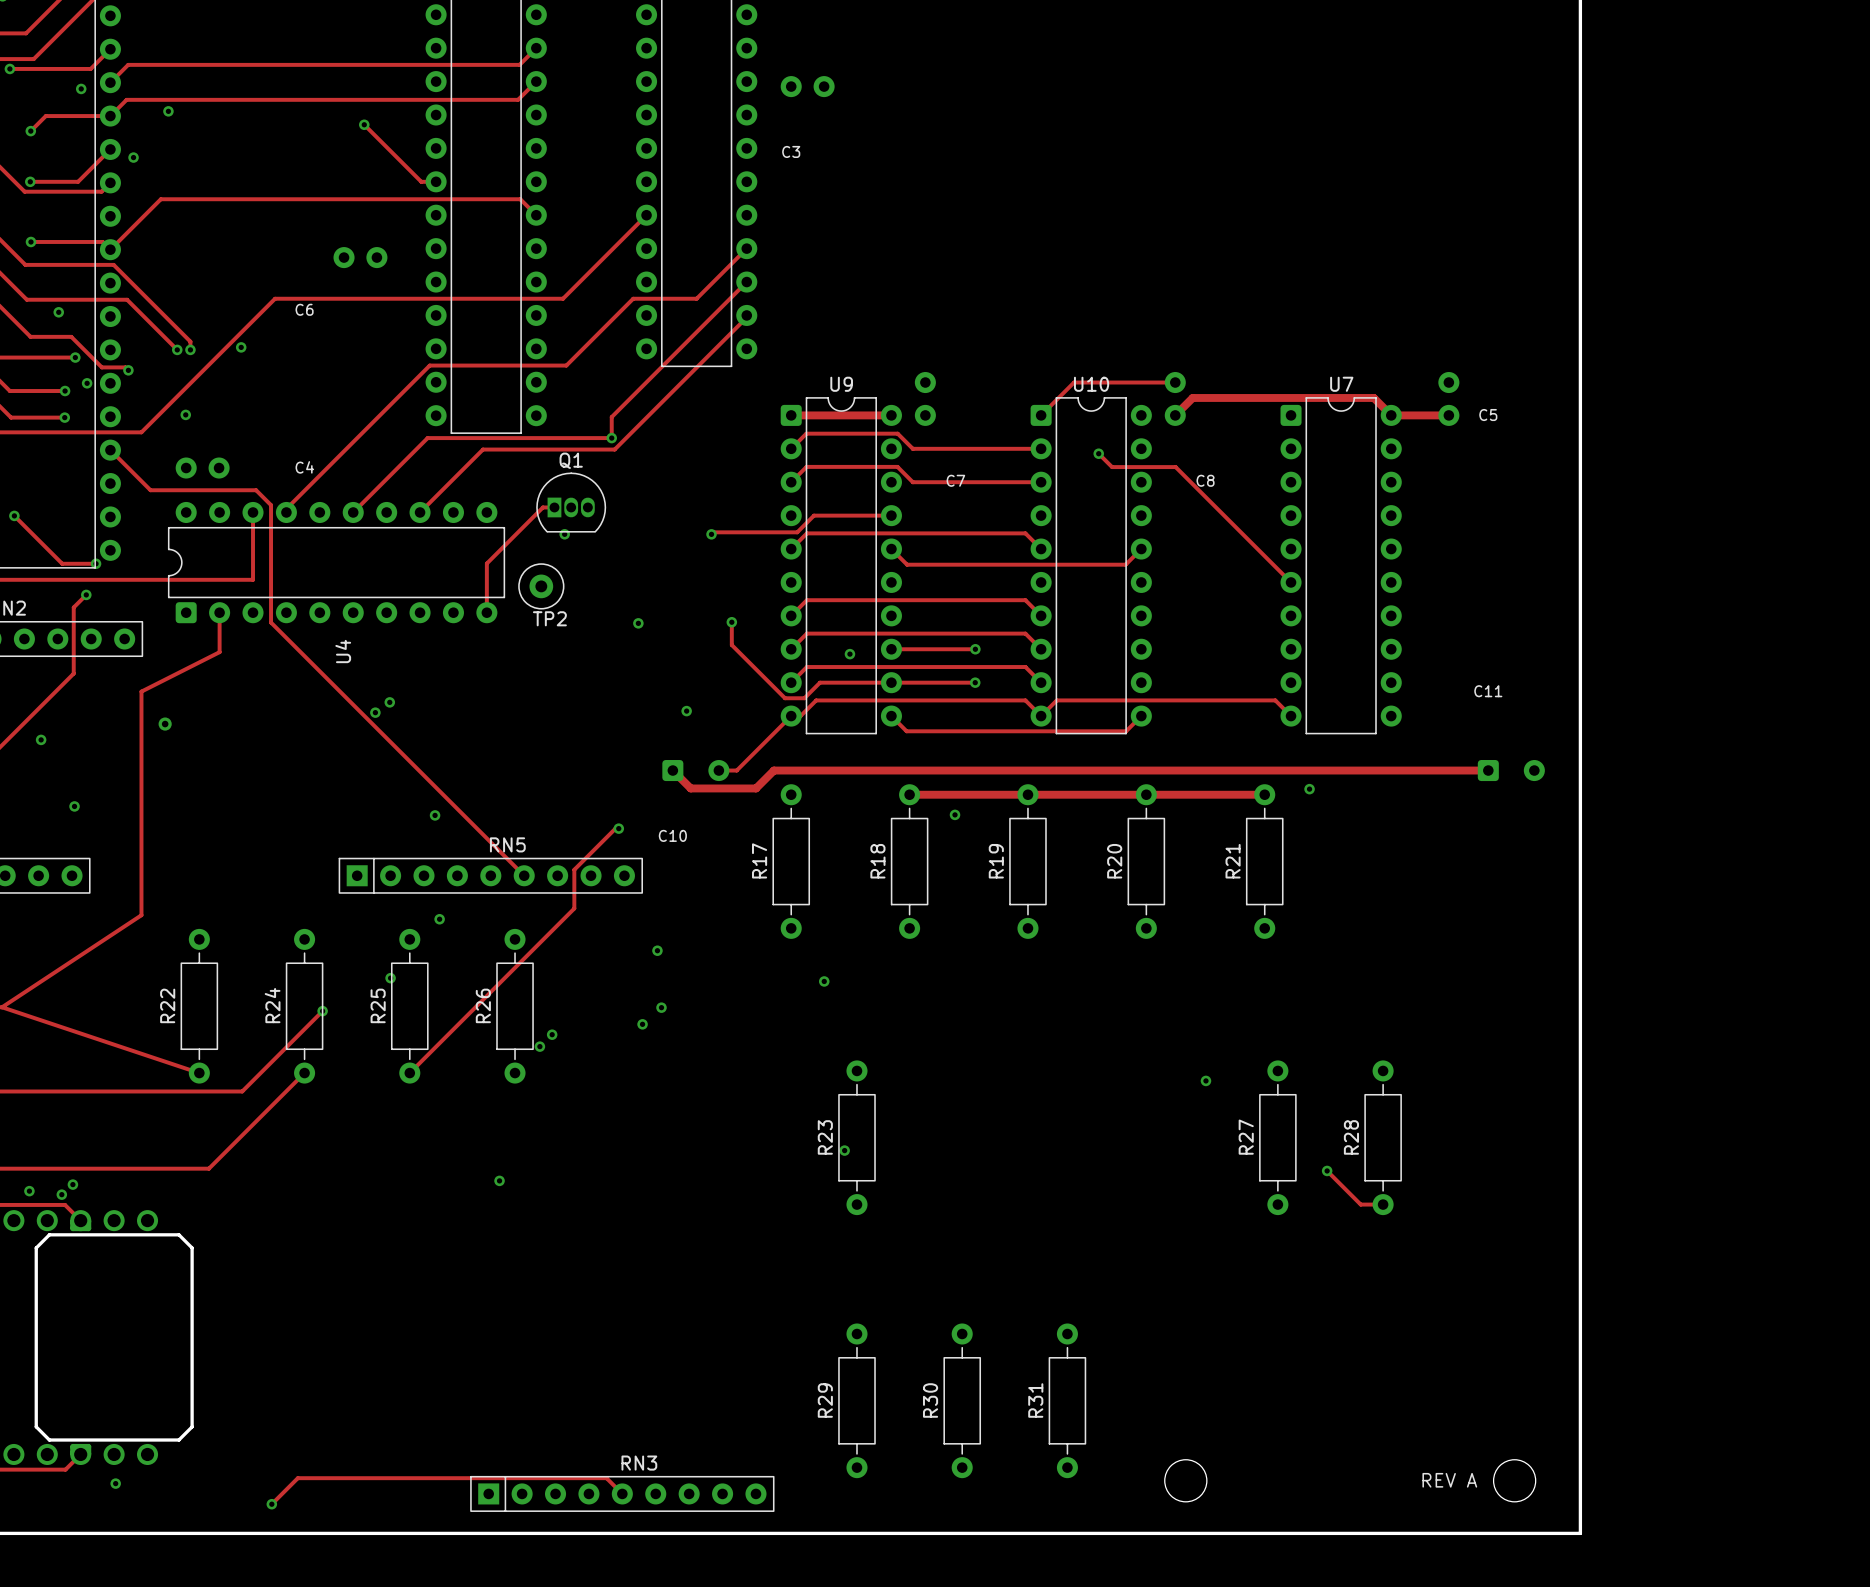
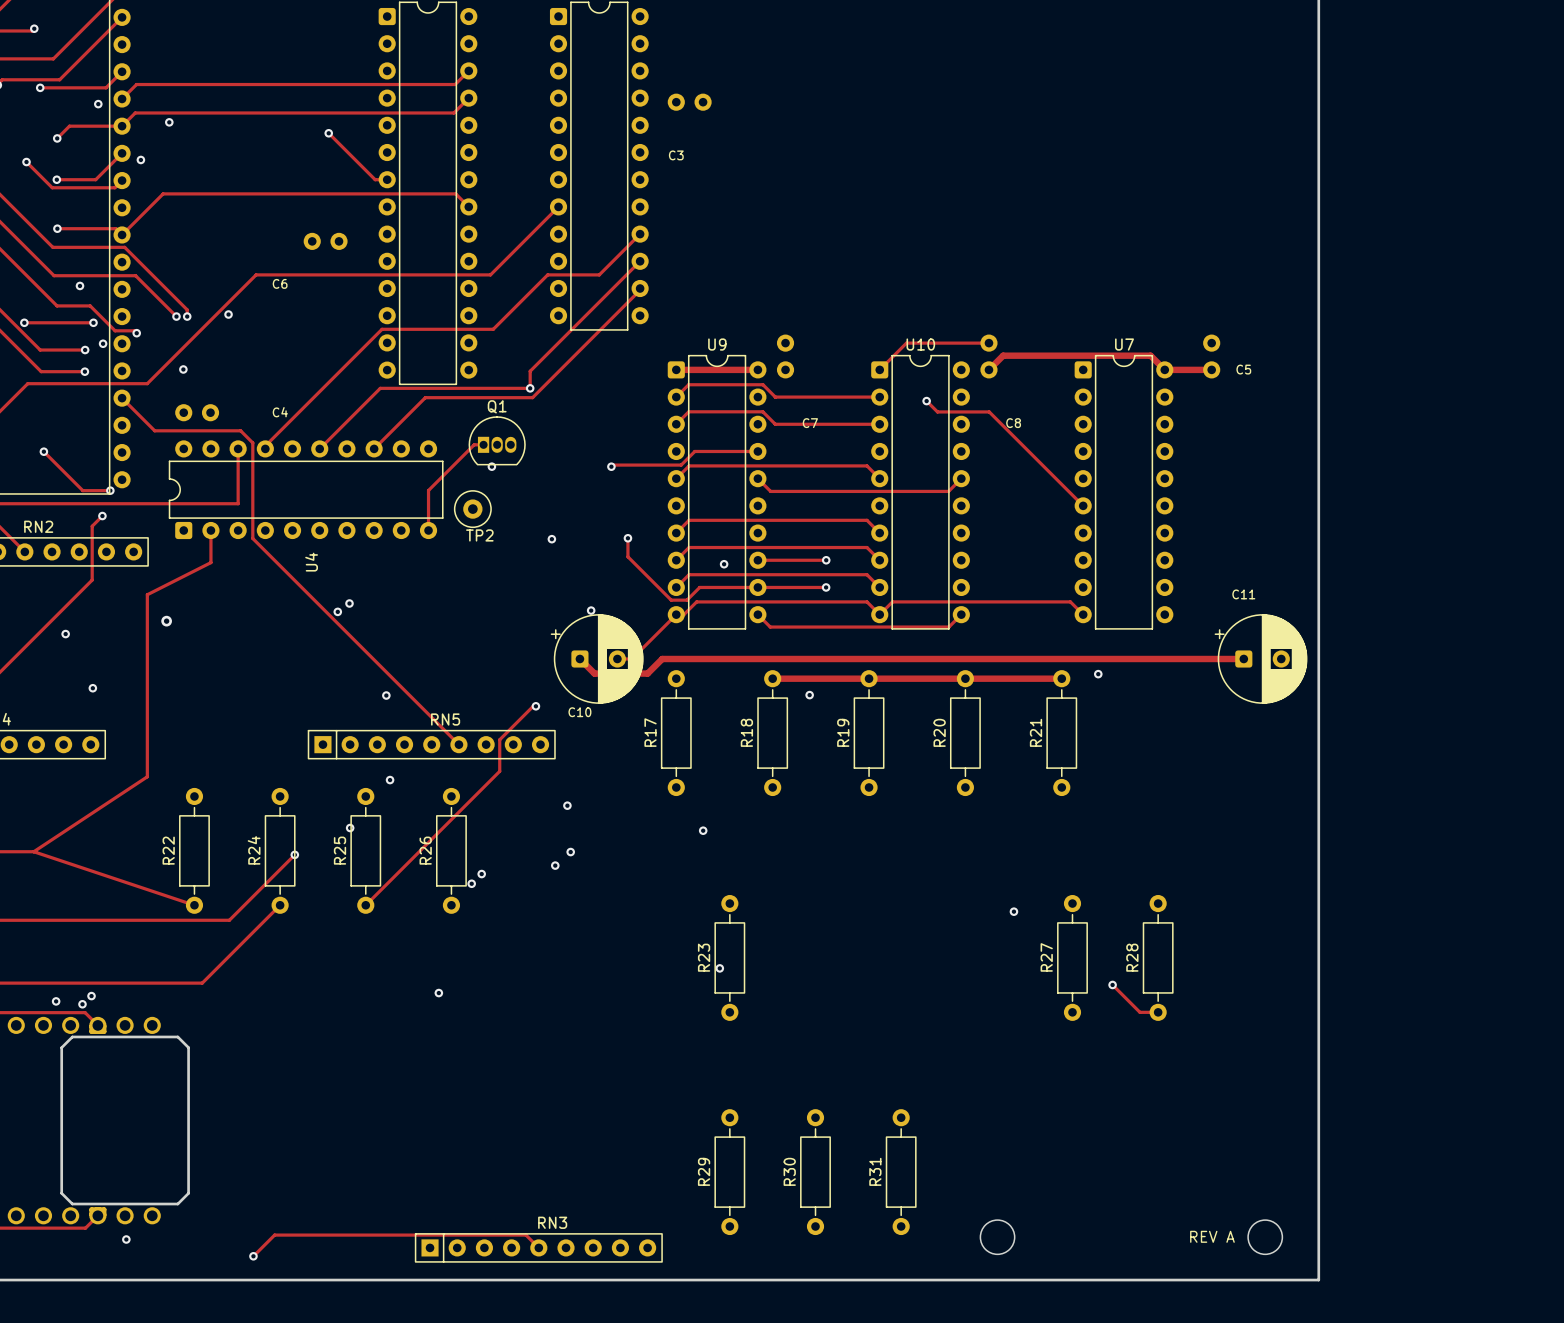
part footprint: [662, 760, 730, 782] -> [550, 614, 644, 704]
part footprint: [1477, 760, 1545, 782] -> [1214, 614, 1308, 704]

